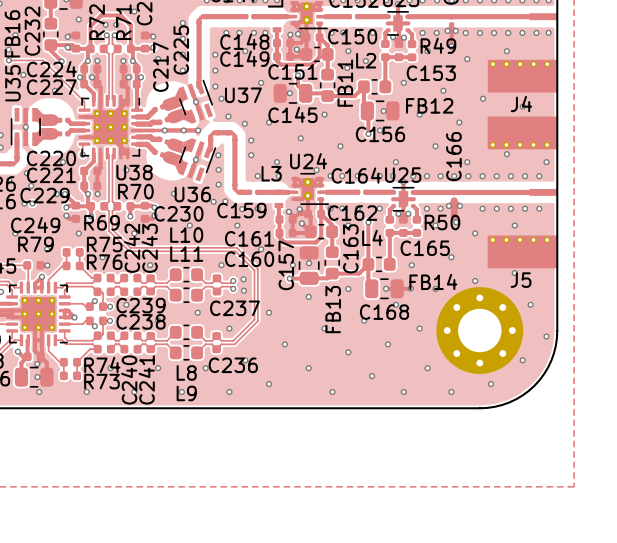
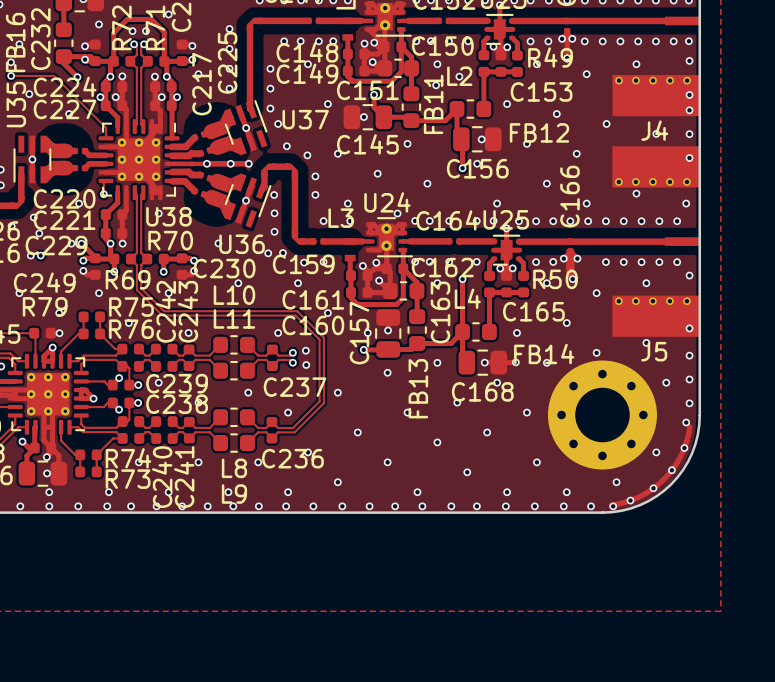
via: none -> (689, 60)
via: none -> (689, 94)
via: none -> (689, 110)
via: none -> (689, 134)
via: none -> (689, 158)
via: none -> (689, 275)
via: none -> (689, 328)
via: none -> (689, 355)
via: none -> (689, 379)
via: none -> (689, 403)
track: none -> (689, 426) (681, 454) (663, 480) (639, 496) (611, 505)
via: none -> (684, 448)
via: none -> (671, 470)
via: none -> (653, 488)
via: none -> (630, 500)
via: none -> (20, 506)
via: none -> (49, 506)
via: none -> (78, 506)
via: none -> (107, 506)
via: none -> (131, 506)
via: none -> (156, 506)
via: none -> (182, 506)
via: none -> (207, 506)
via: none -> (233, 506)
via: none -> (258, 506)
via: none -> (286, 506)
via: none -> (313, 506)
via: none -> (342, 506)
via: none -> (369, 506)
via: none -> (395, 506)
via: none -> (422, 506)
via: none -> (451, 506)
via: none -> (476, 506)
via: none -> (505, 506)
via: none -> (534, 506)
via: none -> (563, 506)
via: none -> (591, 506)
via: none -> (613, 506)

